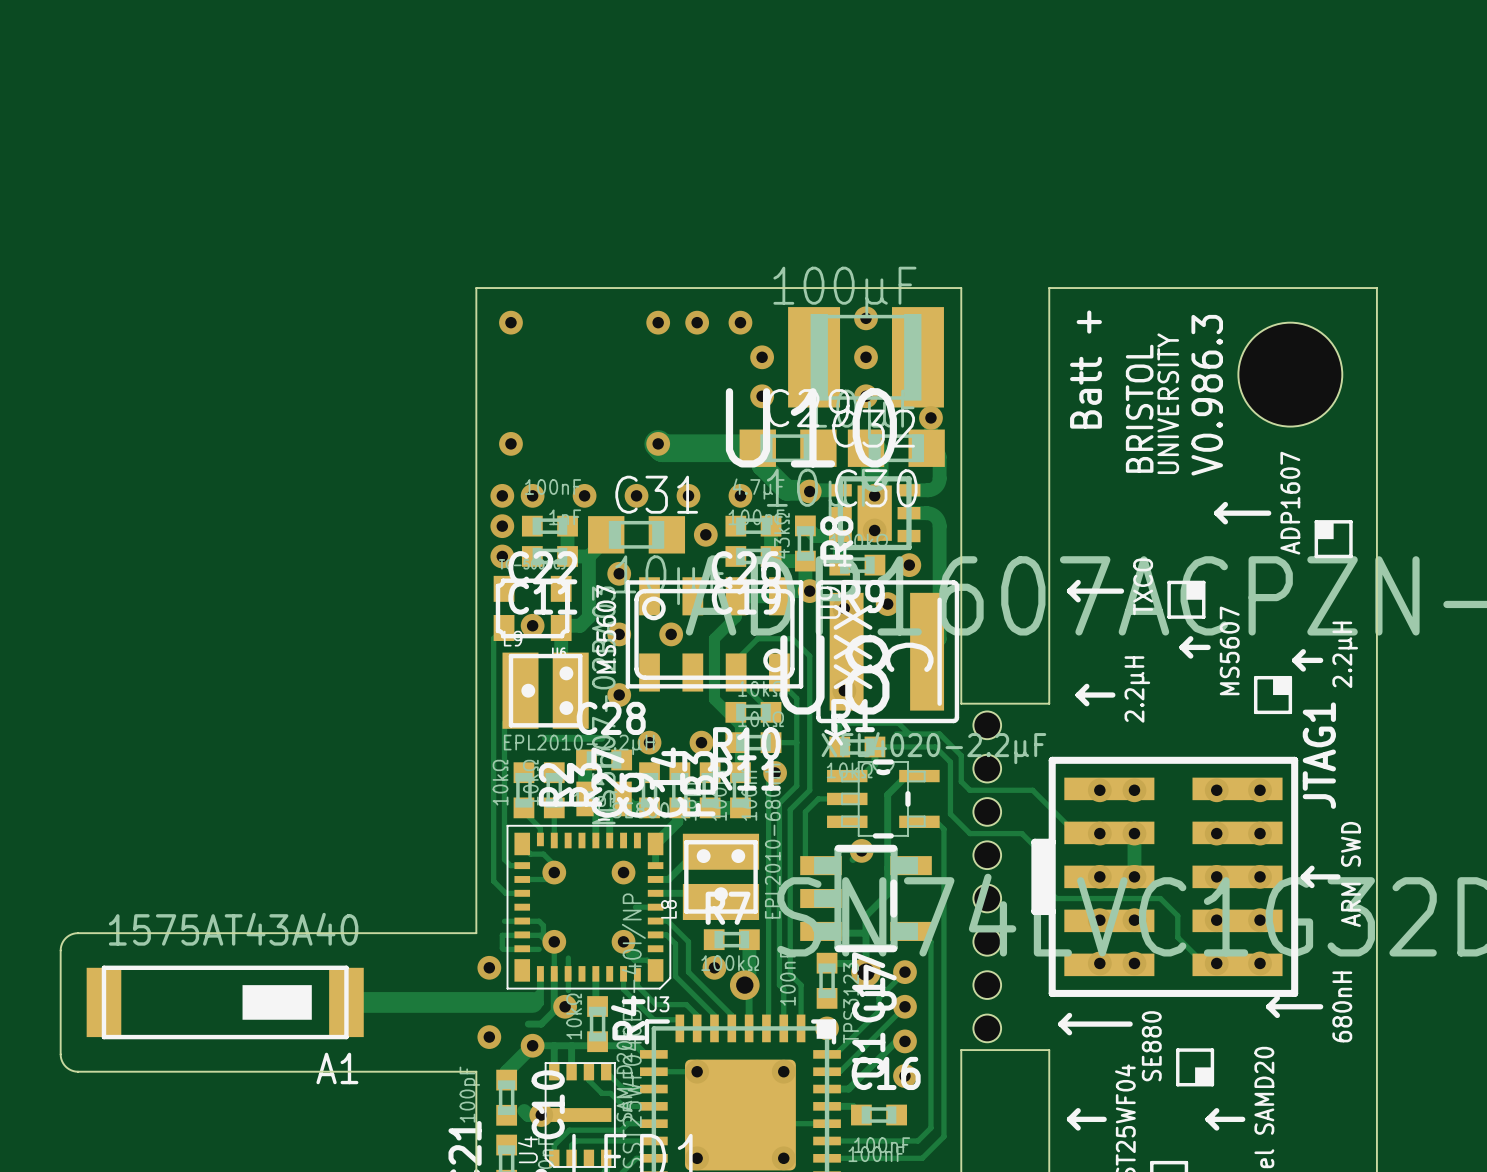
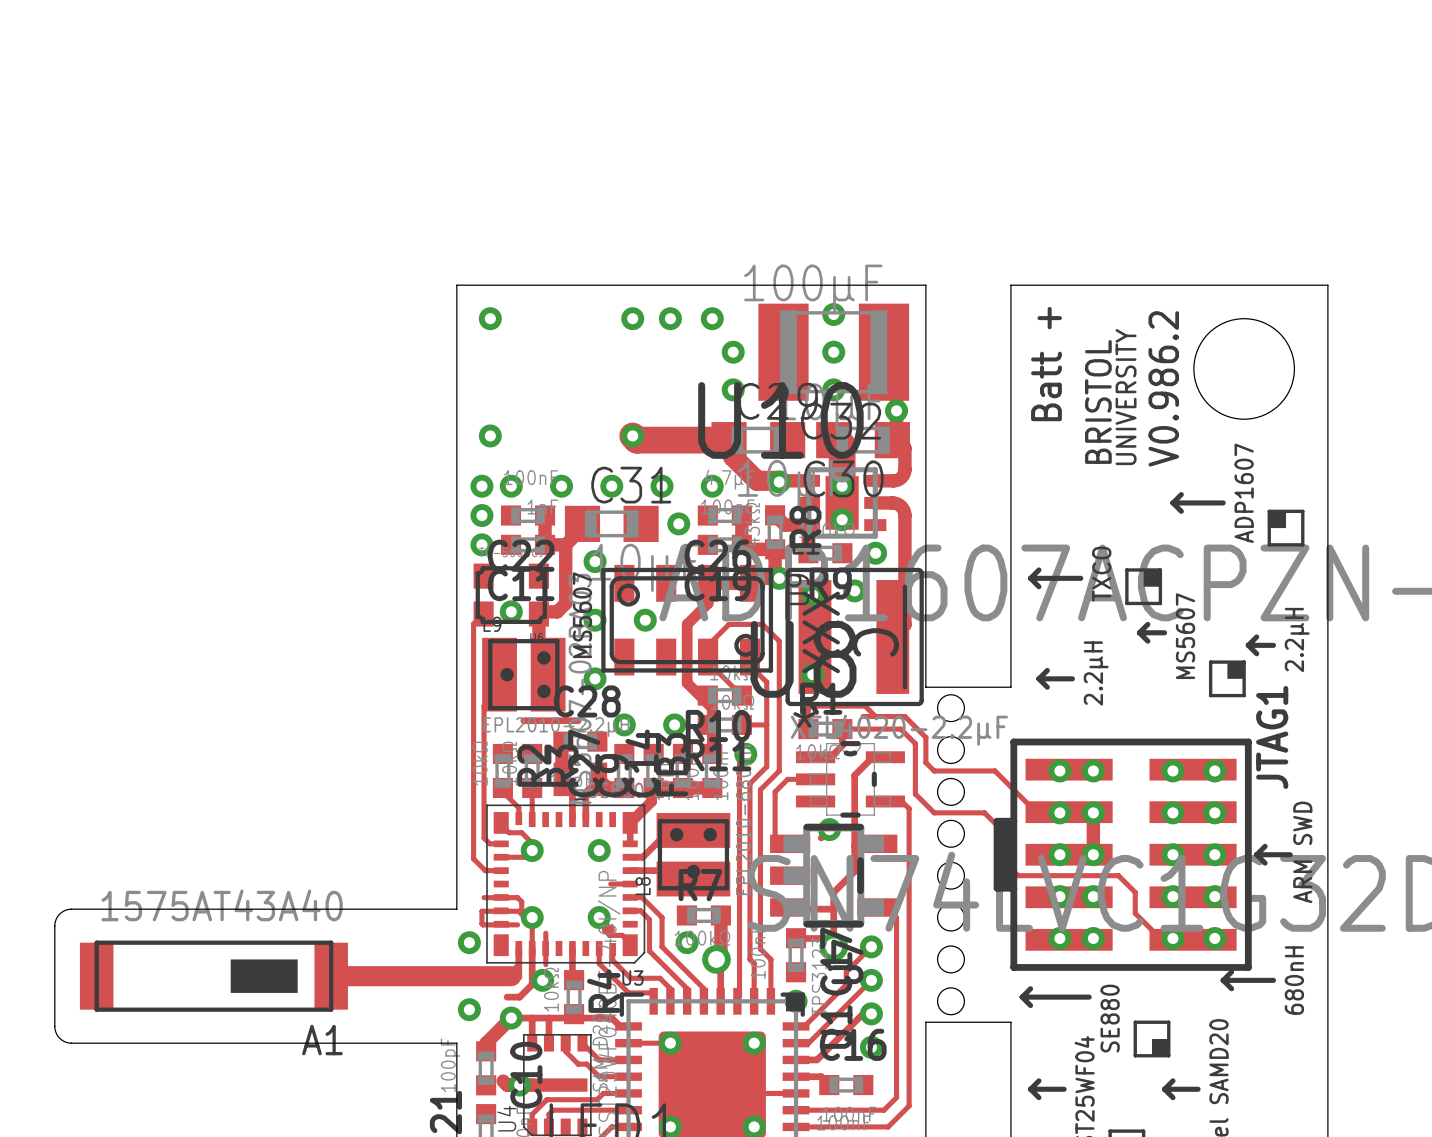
text: V0.986.3 (1207, 395) -> V0.986.2 (1163, 388)

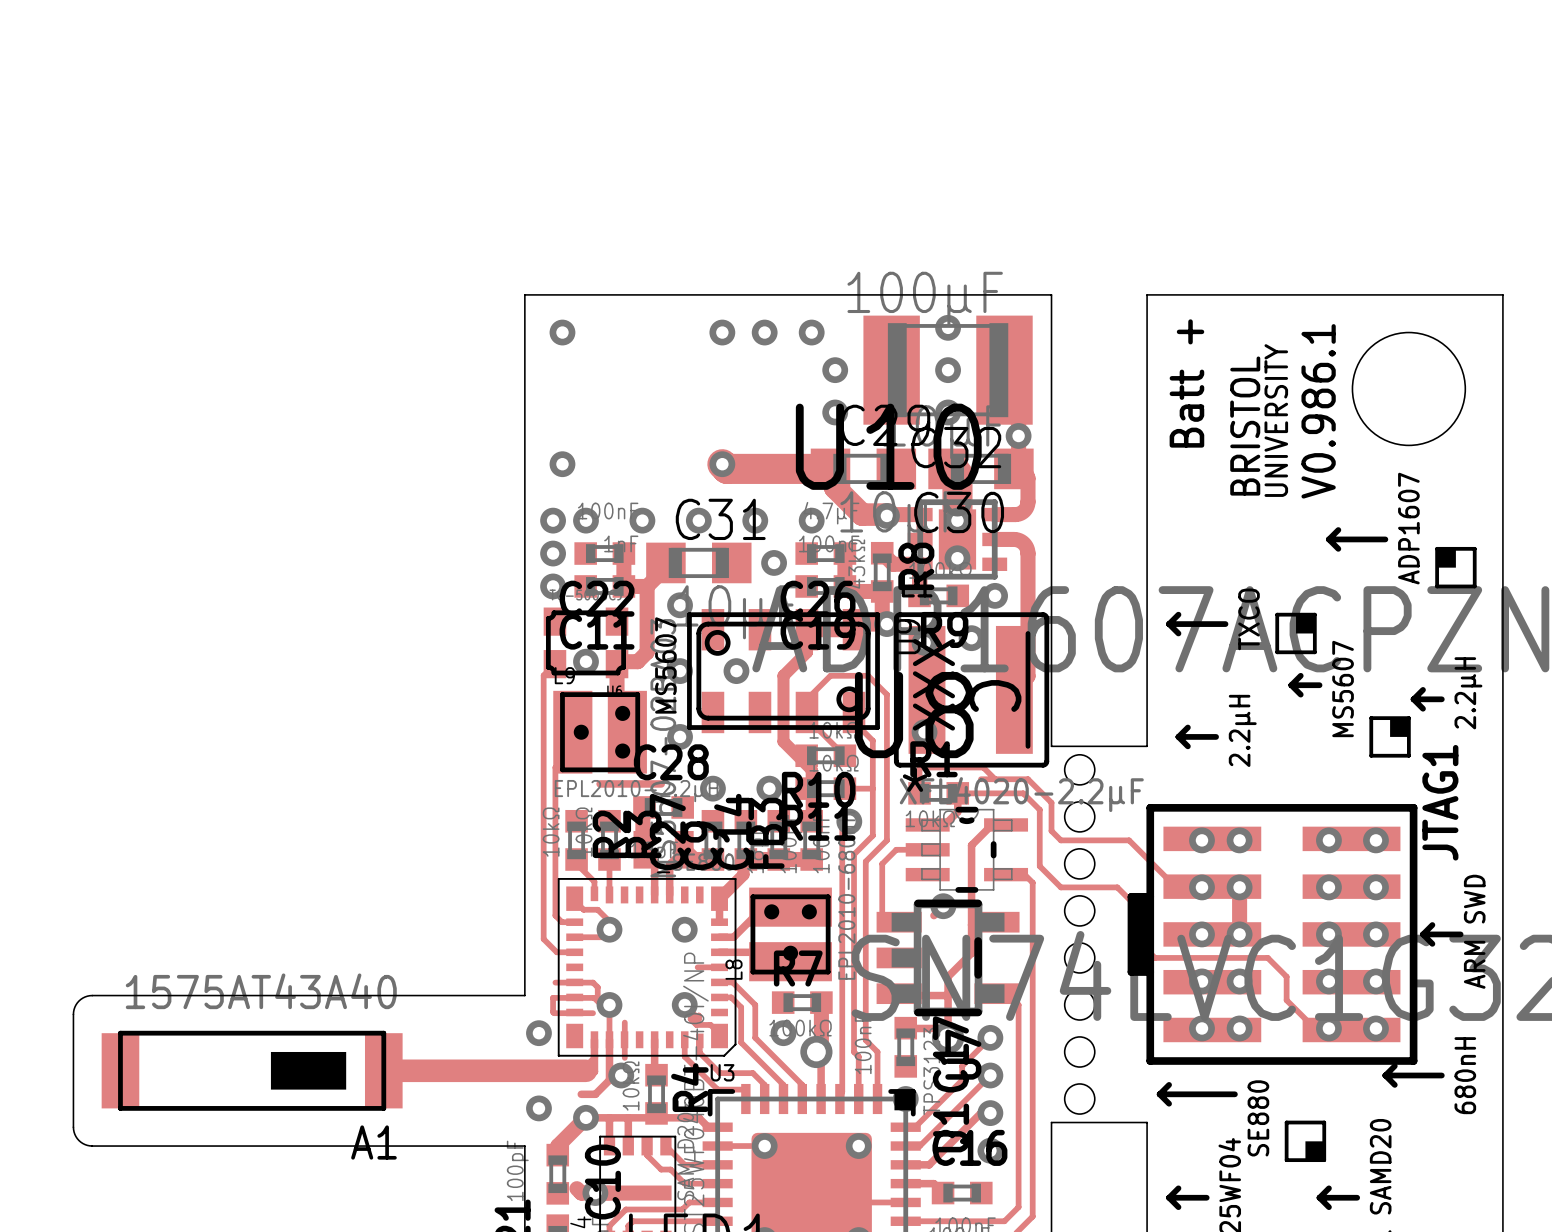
text: V0.986.2 (1163, 388) -> V0.986.1 (1318, 411)

